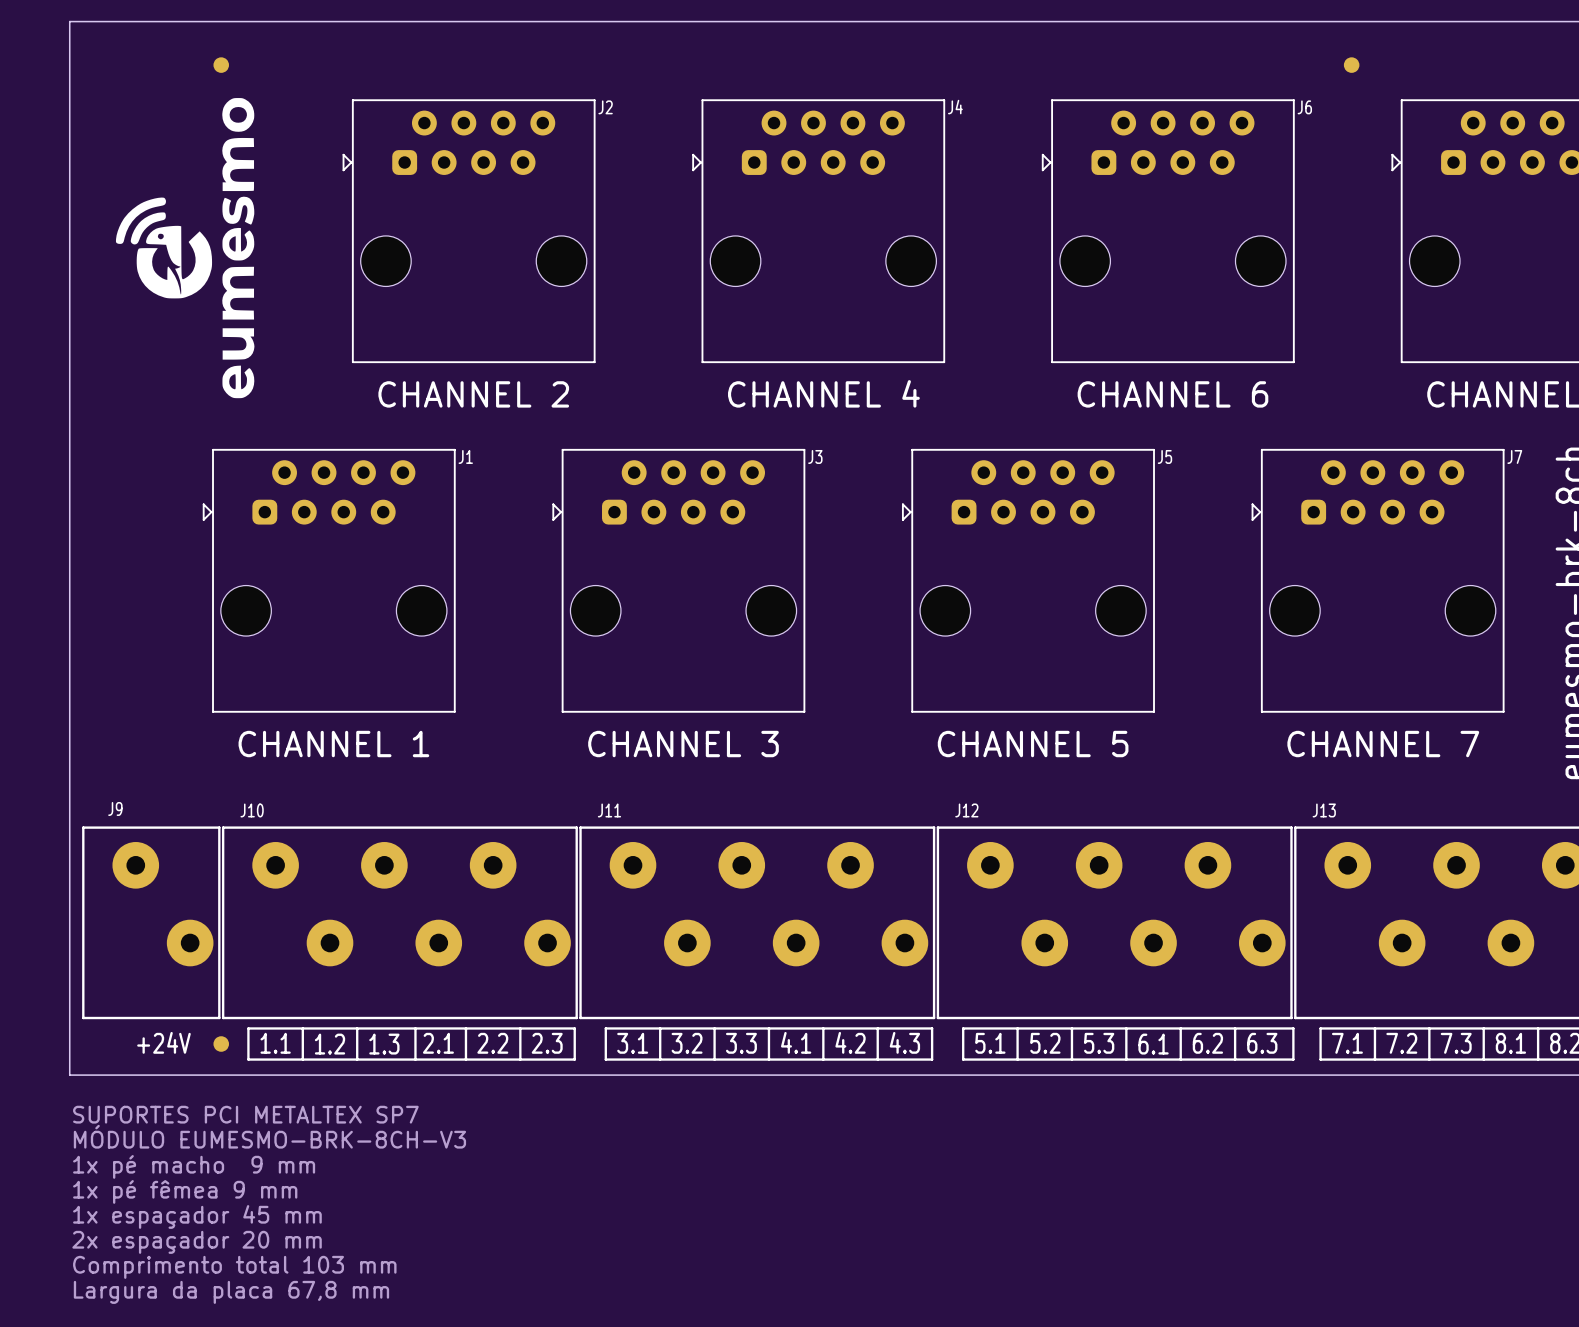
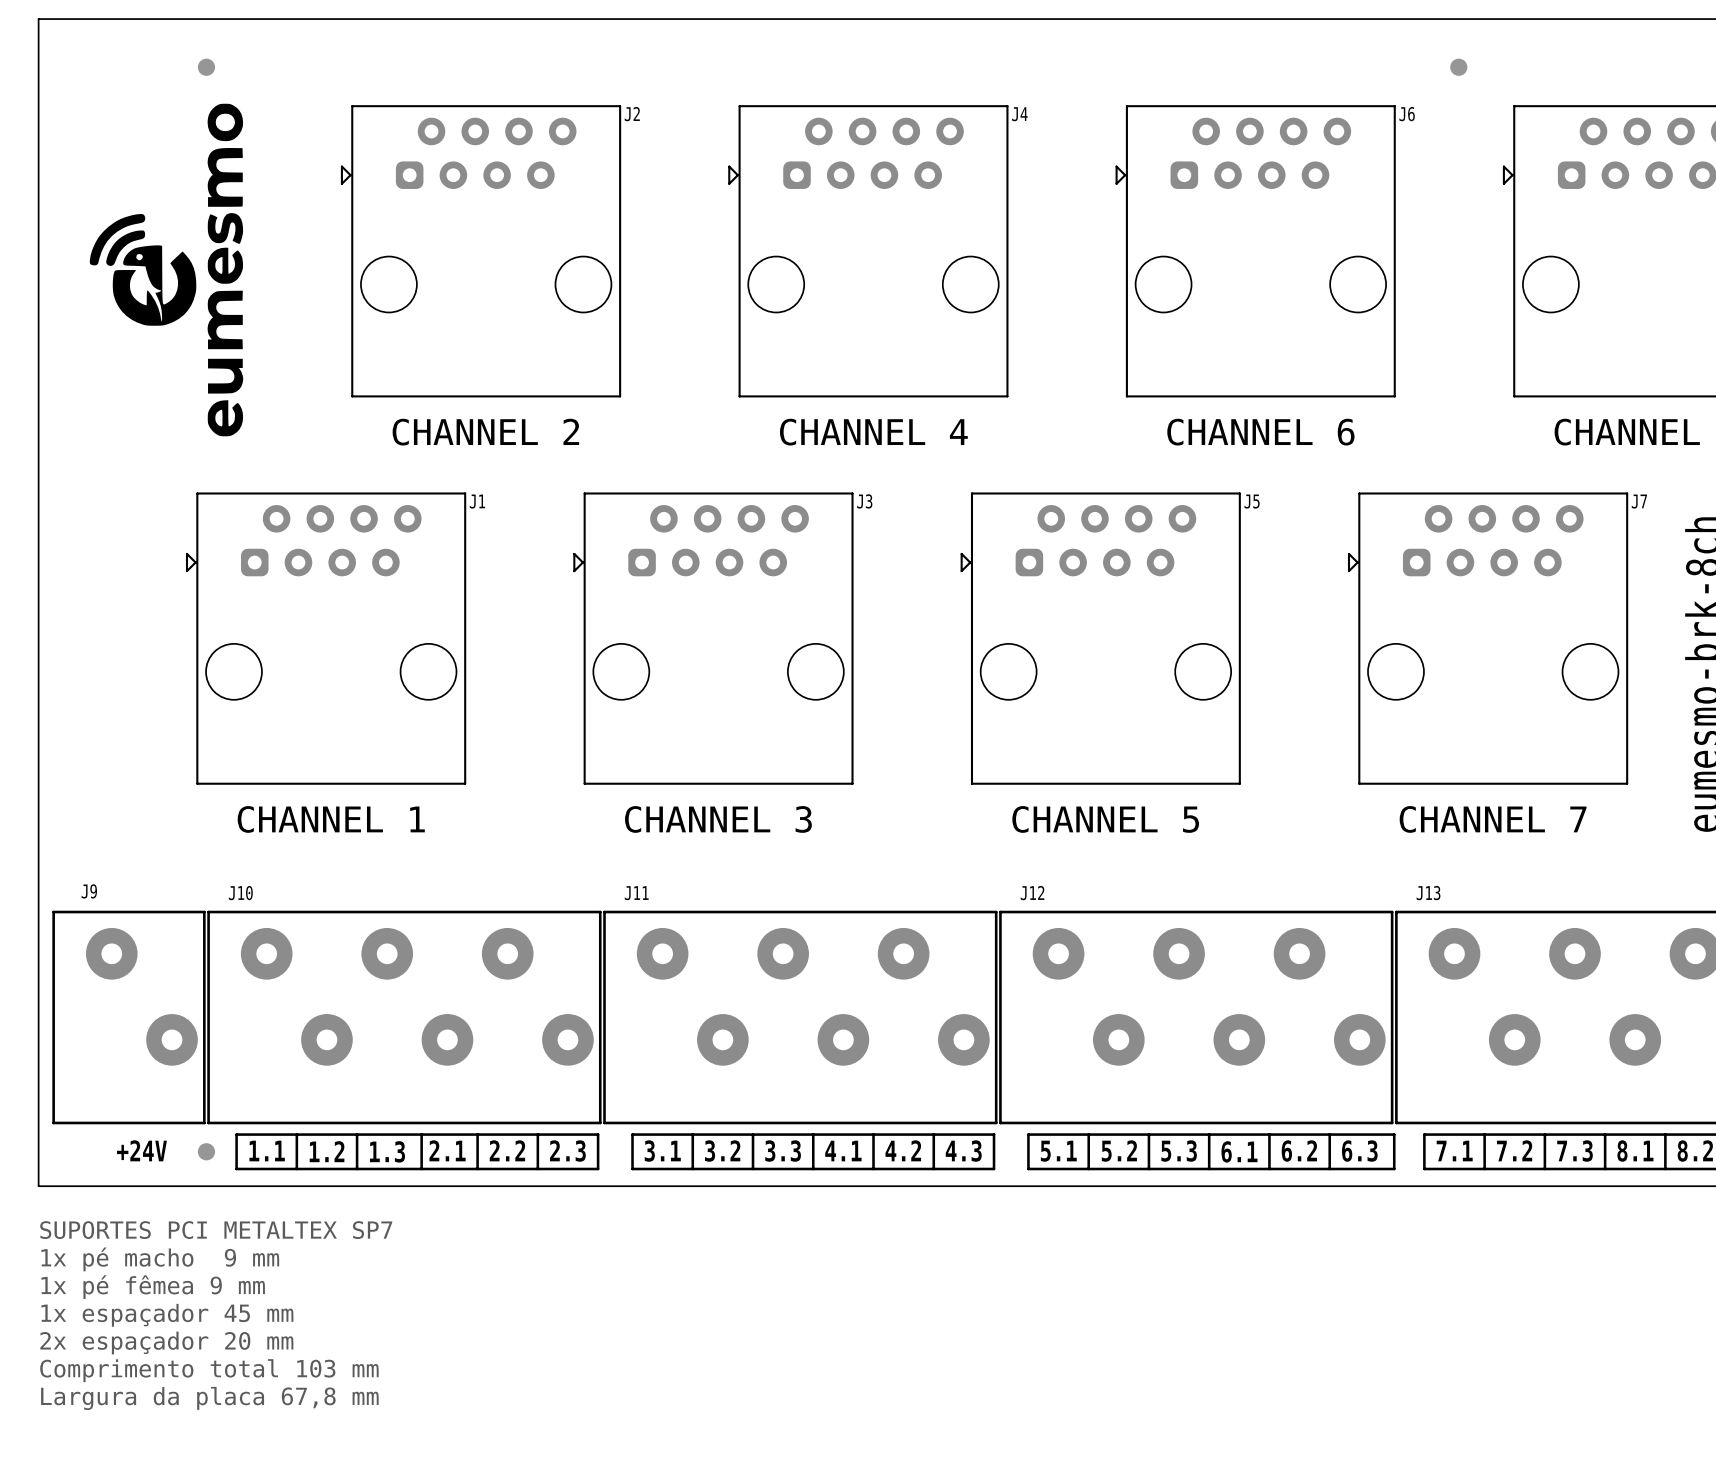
text: MÓDULO EUMESMO-BRK-8CH-V3 (269, 1136) -> 1x pé macho 9 mm (160, 1259)
text: 1x pé macho 9 mm (194, 1166) -> 1x pé fêmea 9 mm (153, 1287)
text: 1x pé fêmea 9 mm (185, 1191) -> 1x espaçador 45 mm (167, 1315)
text: 1x espaçador 45 mm (197, 1216) -> 2x espaçador 20 mm (166, 1343)
text: 2x espaçador 20 mm (197, 1242) -> Comprimento total 103 mm (209, 1370)
text: Comprimento total 103 mm (234, 1267) -> Largura da placa 67,8 mm (209, 1398)
text: Largura da placa 67,8 mm (231, 1292) -> none

